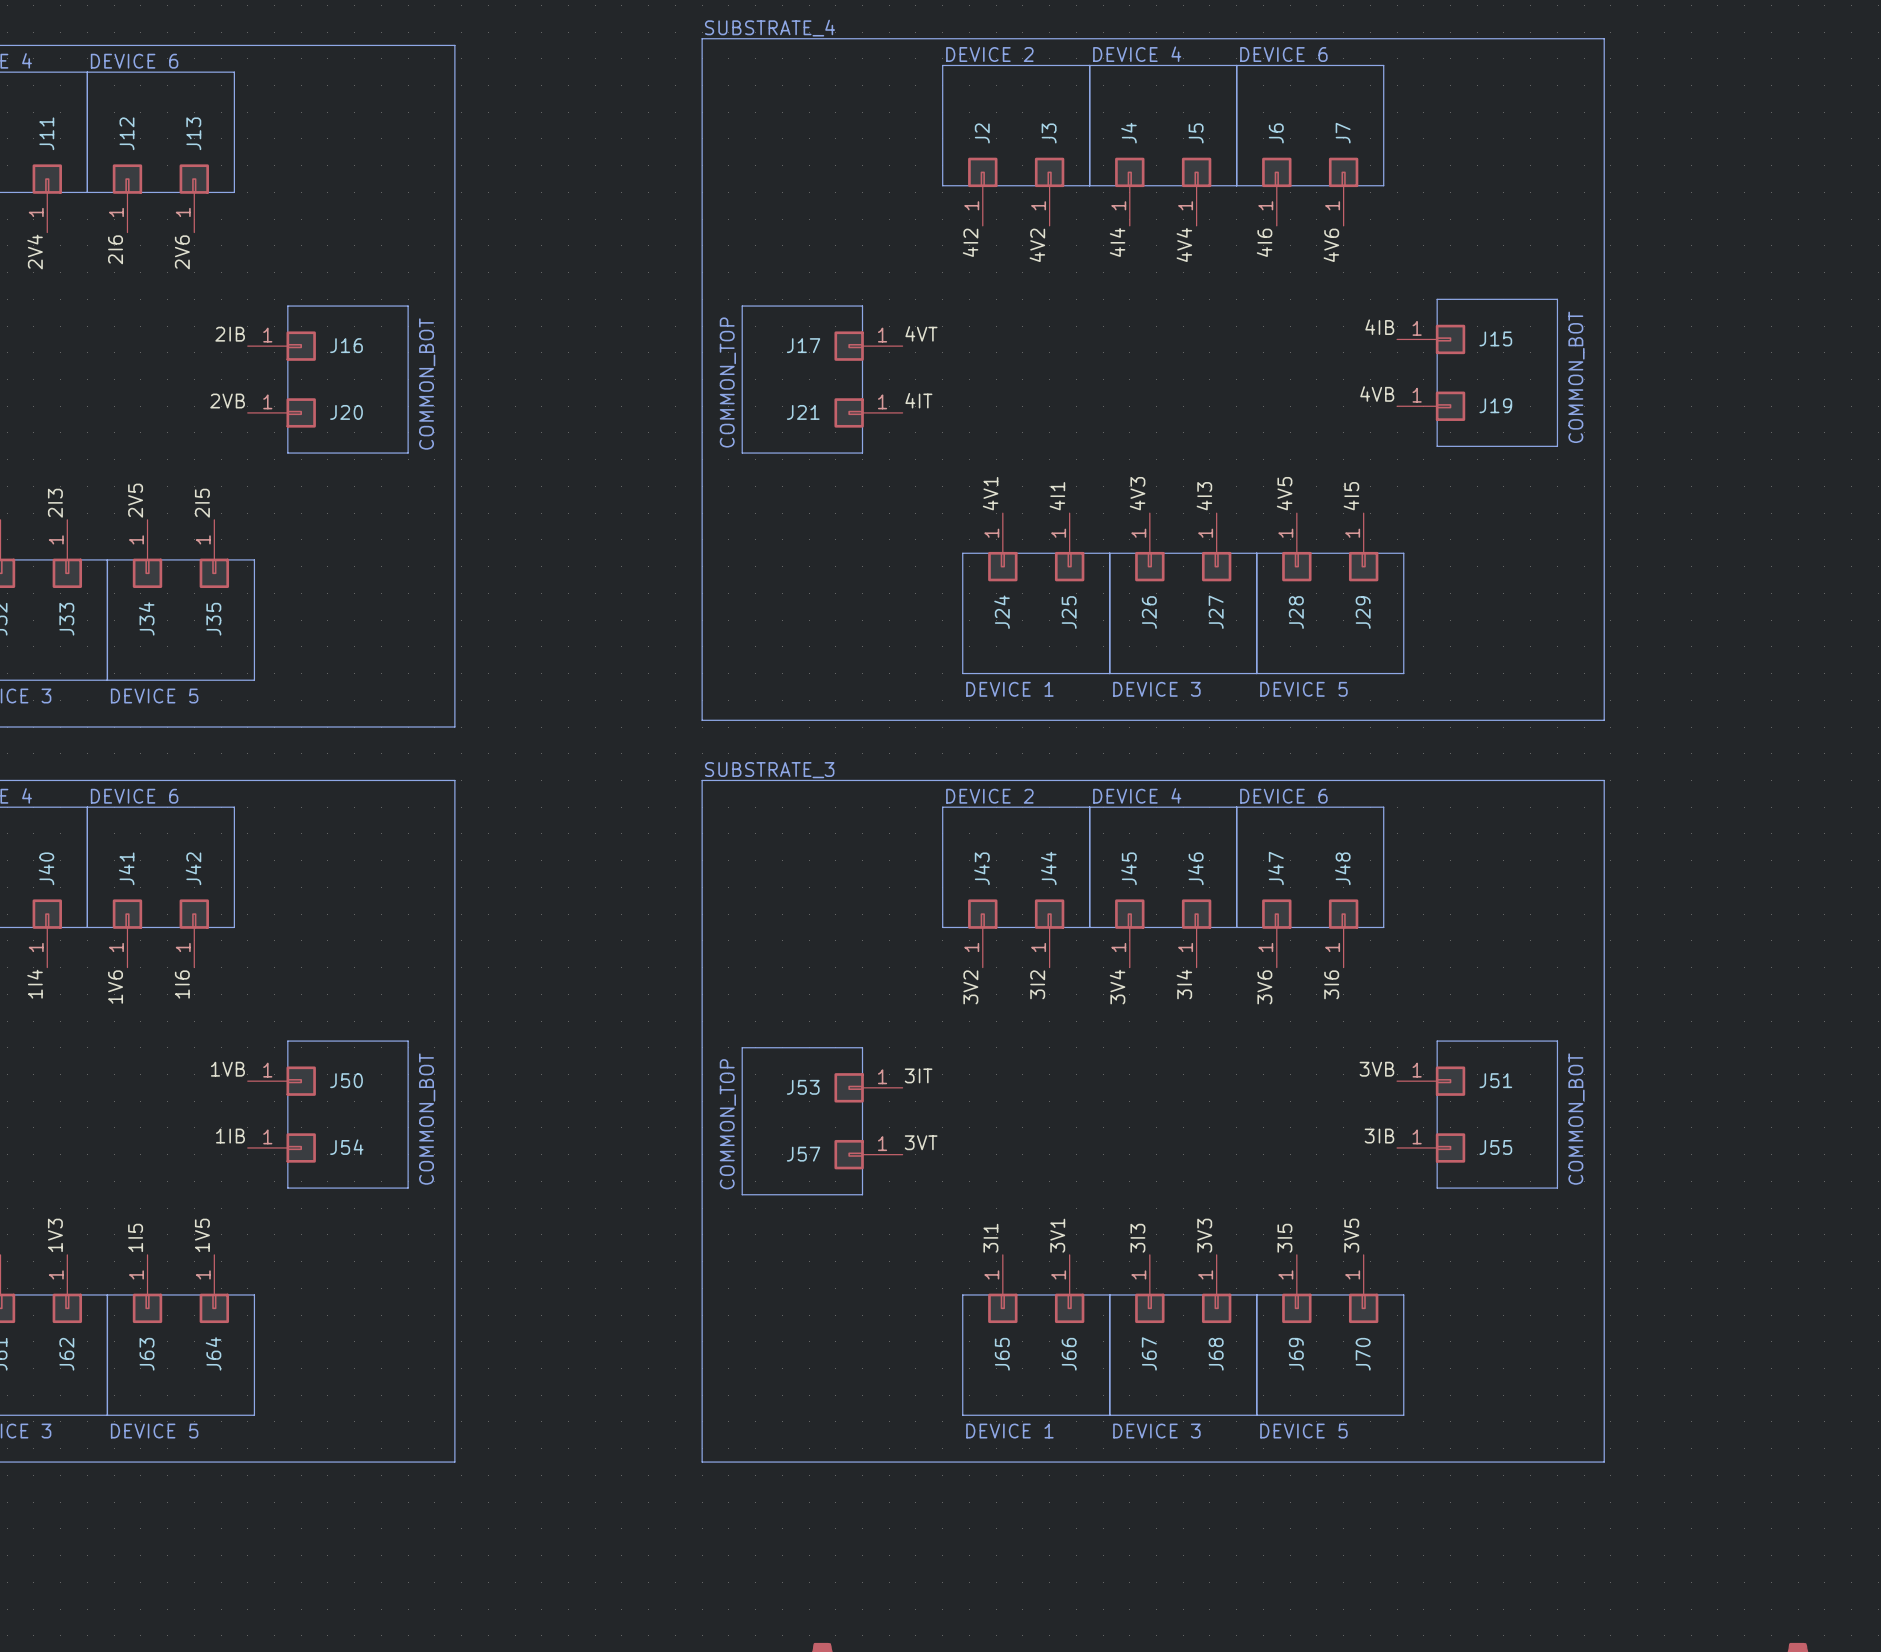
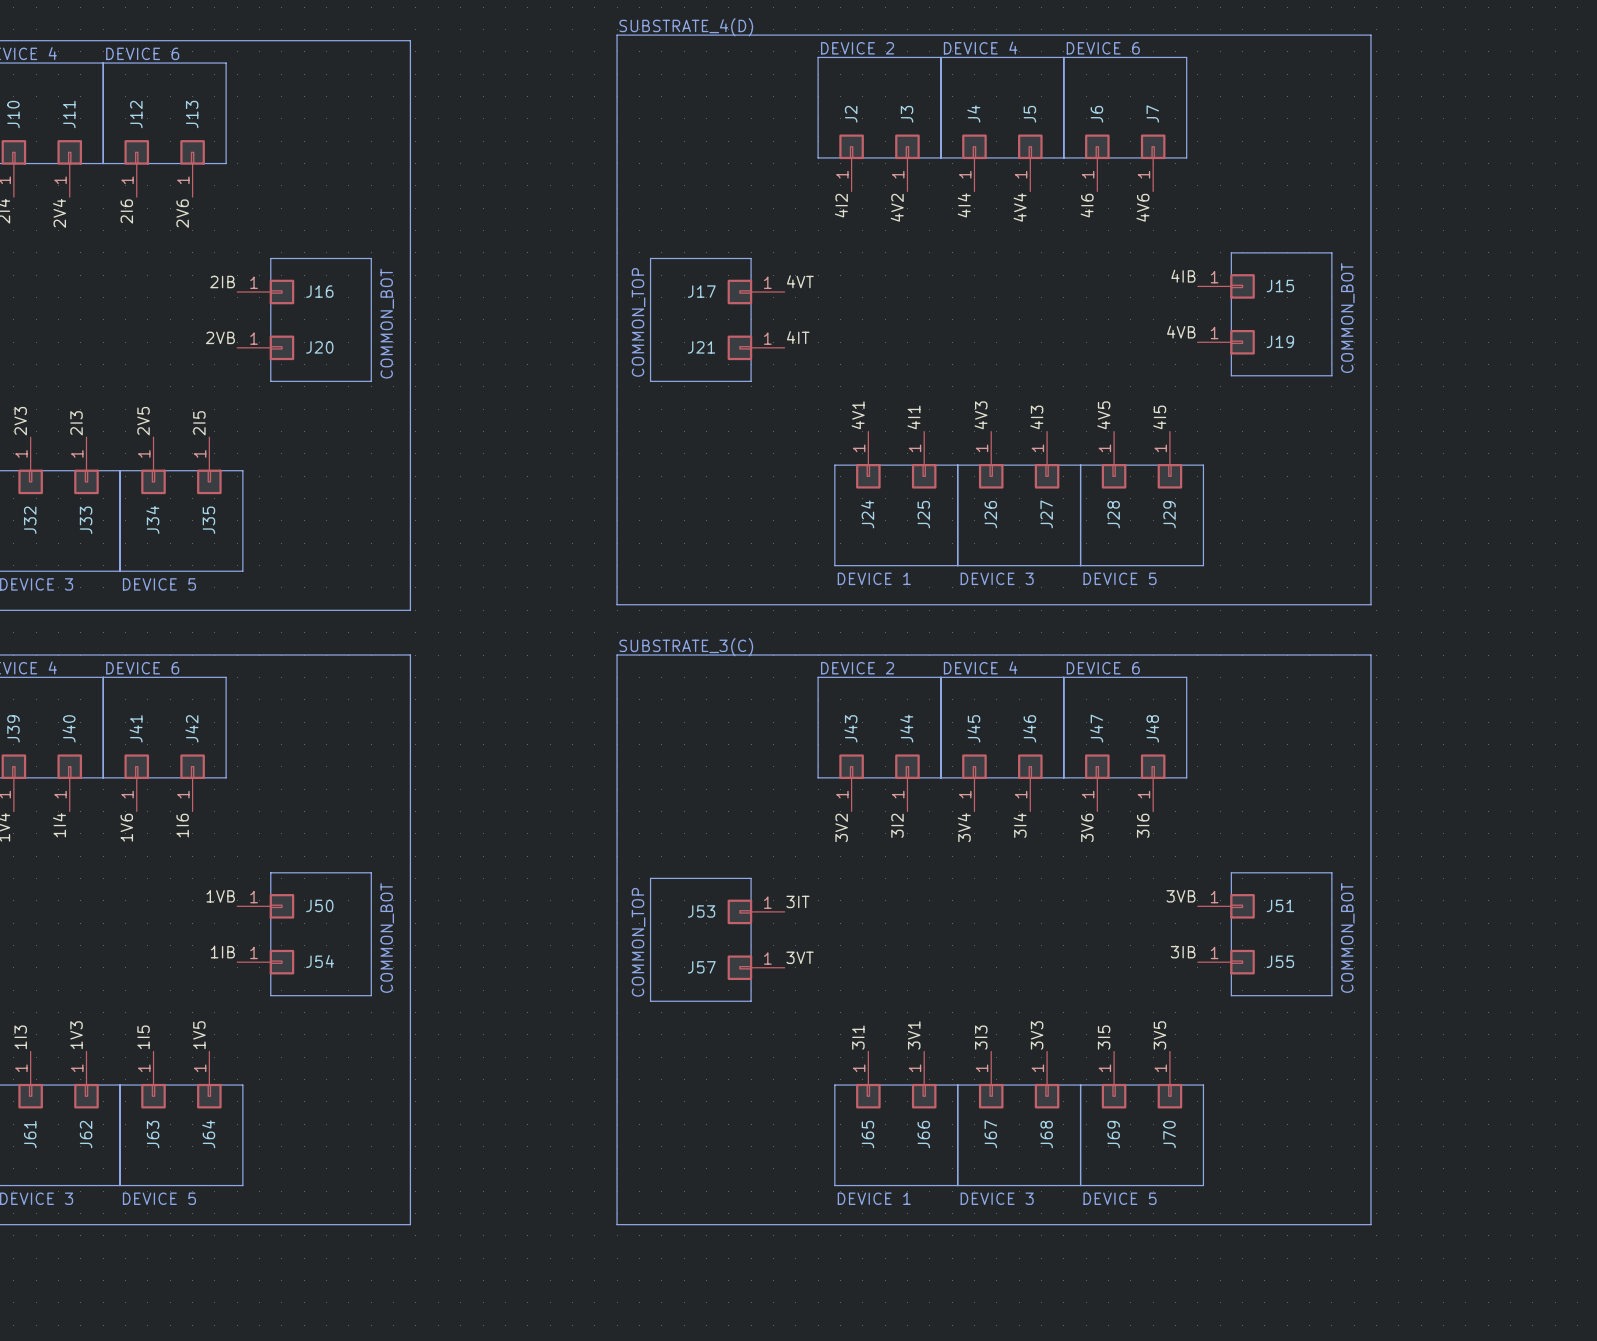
text: SUBSTRATE_4 (770, 28) -> SUBSTRATE_4(D) (686, 27)
text: SUBSTRATE_3 (769, 770) -> SUBSTRATE_3(C) (686, 647)

